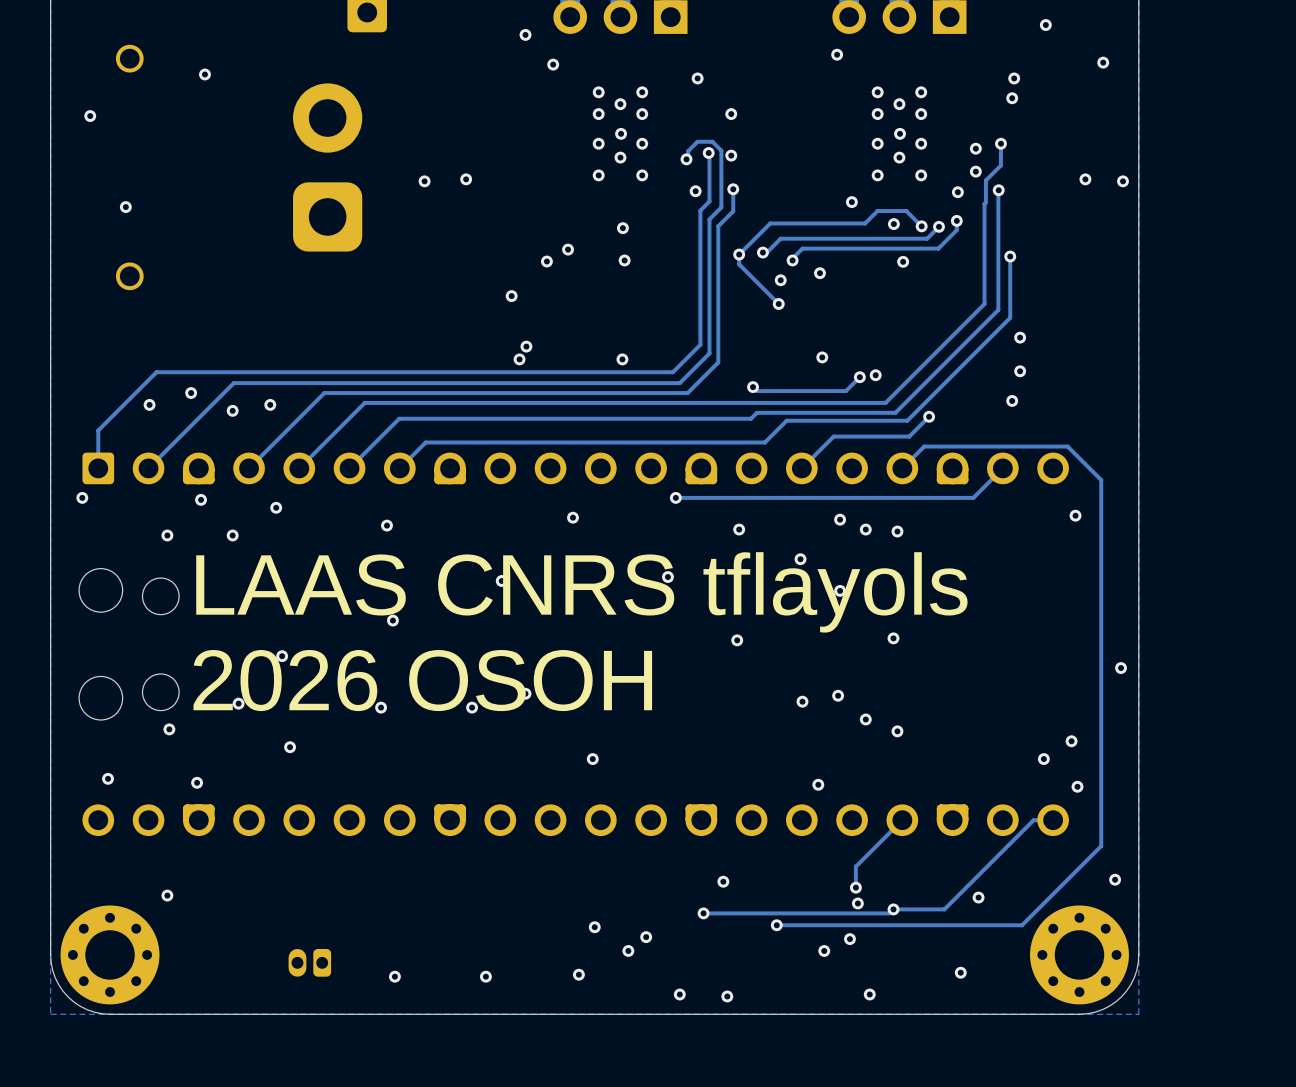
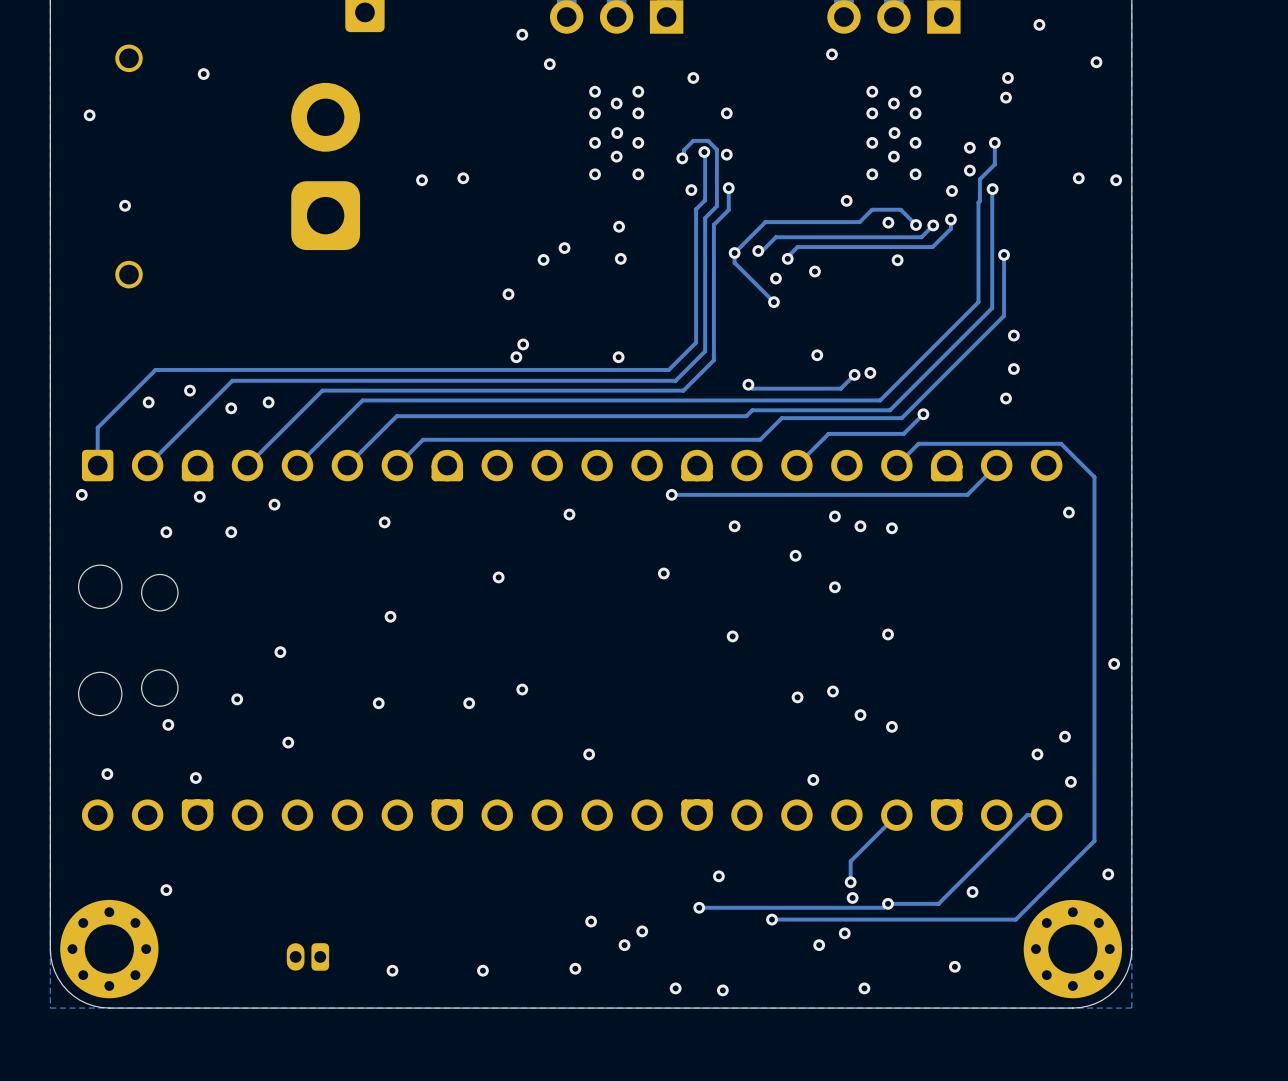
text: LAAS CNRS tflayols (581, 592) -> none
text: 2026 OSOH (422, 680) -> none

